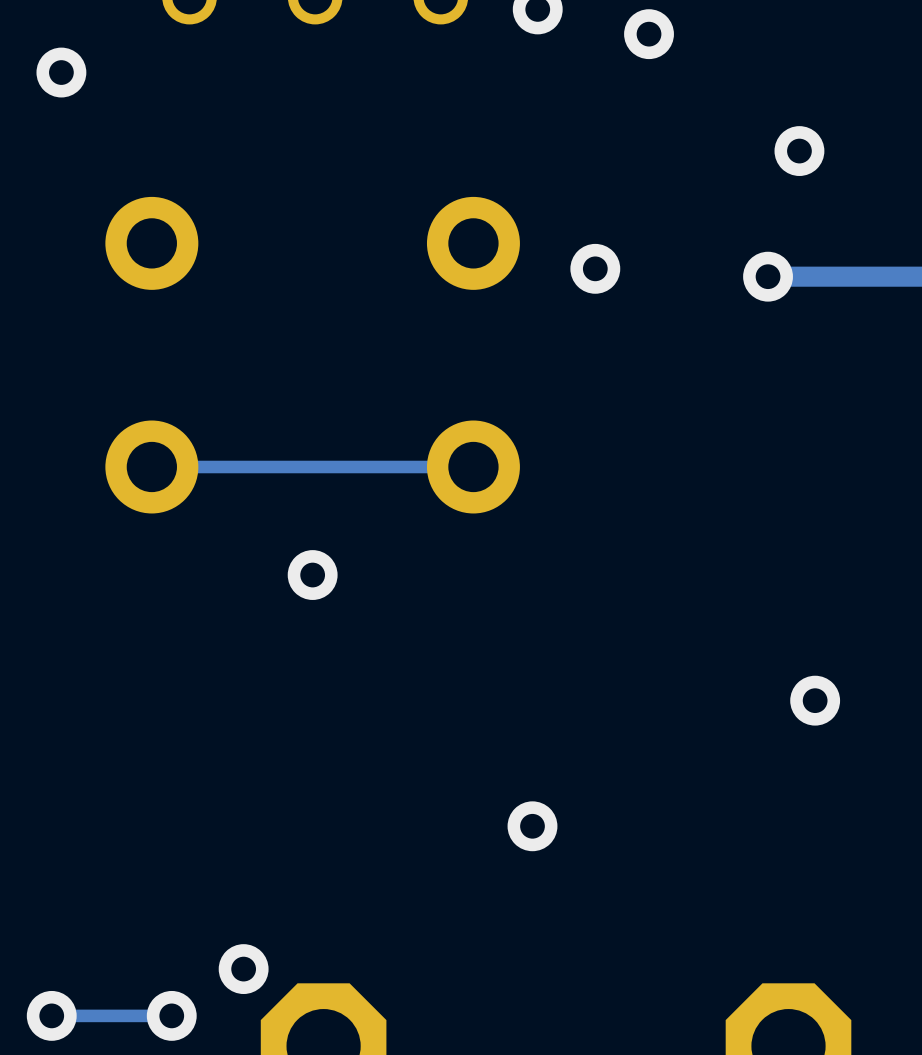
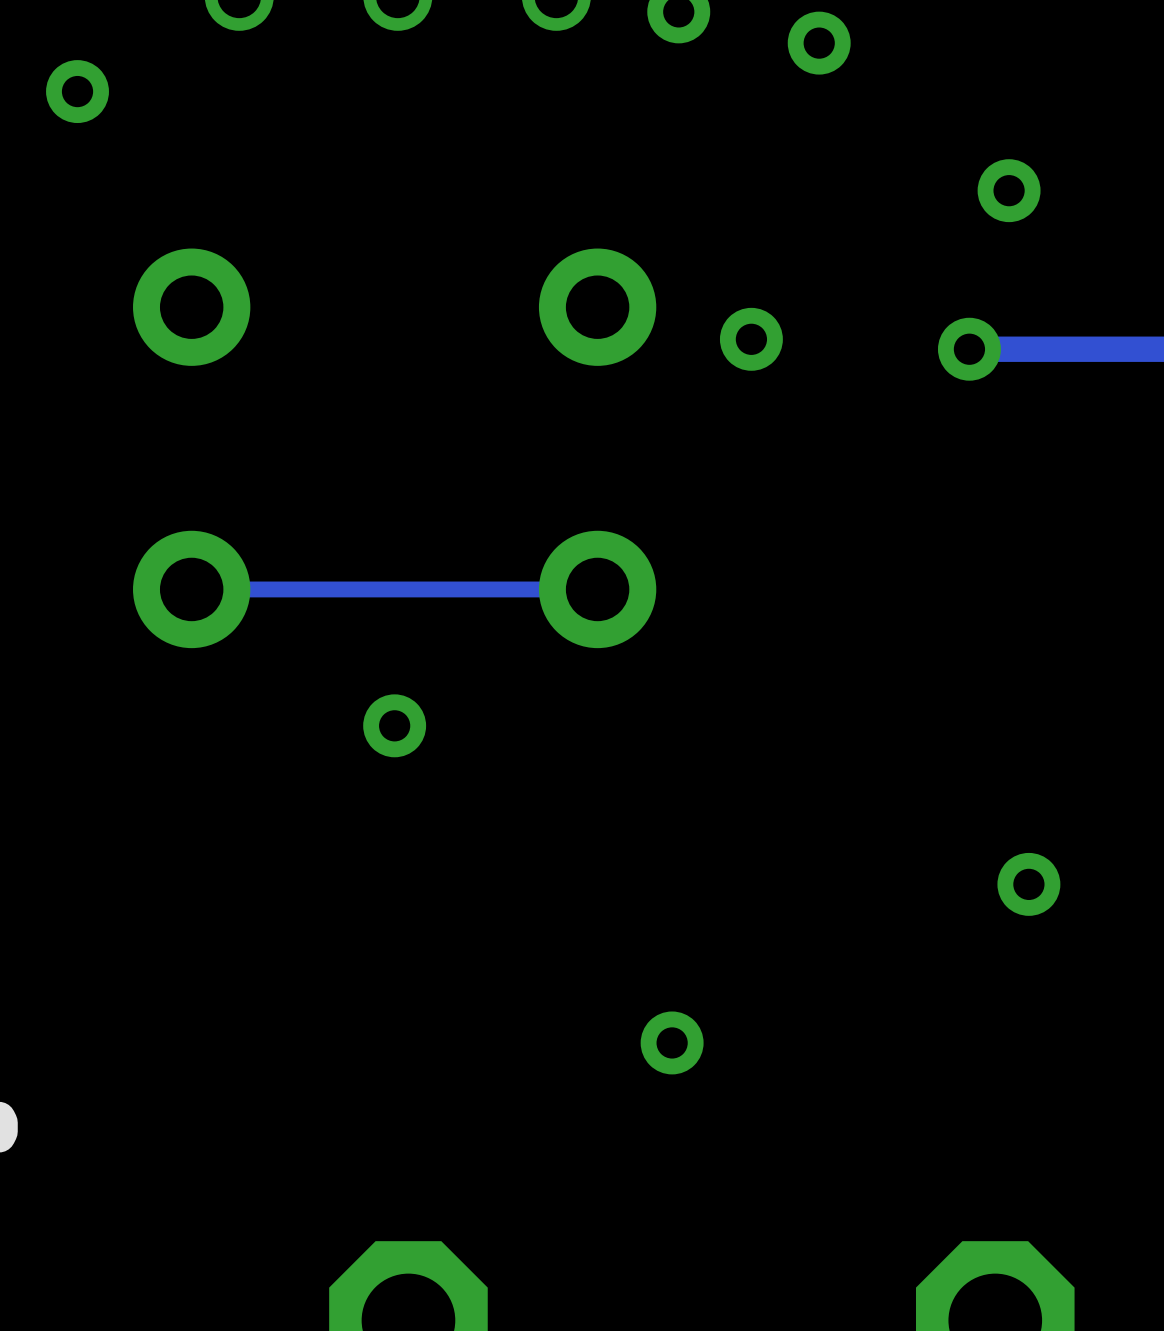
via: (243, 969) -> none
via: (51, 1015) -> none
track: (171, 1015) (51, 1015) -> none
via: (171, 1015) -> none

